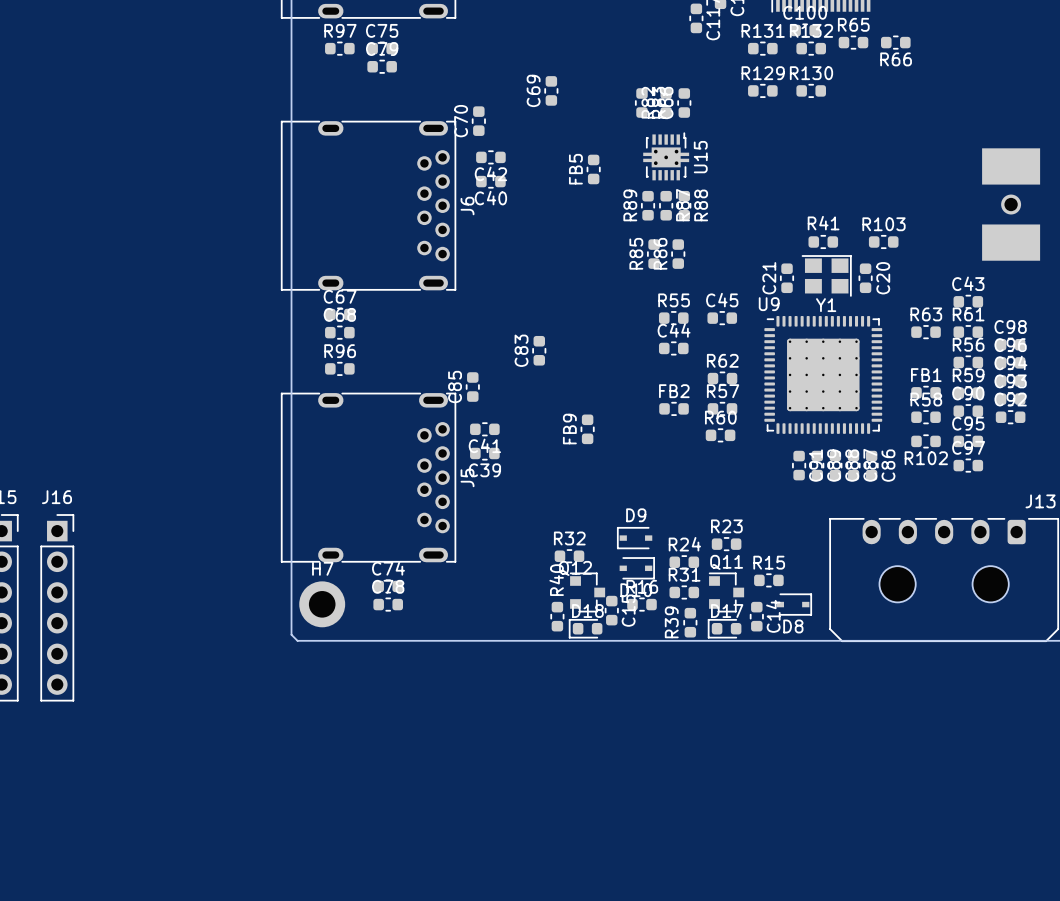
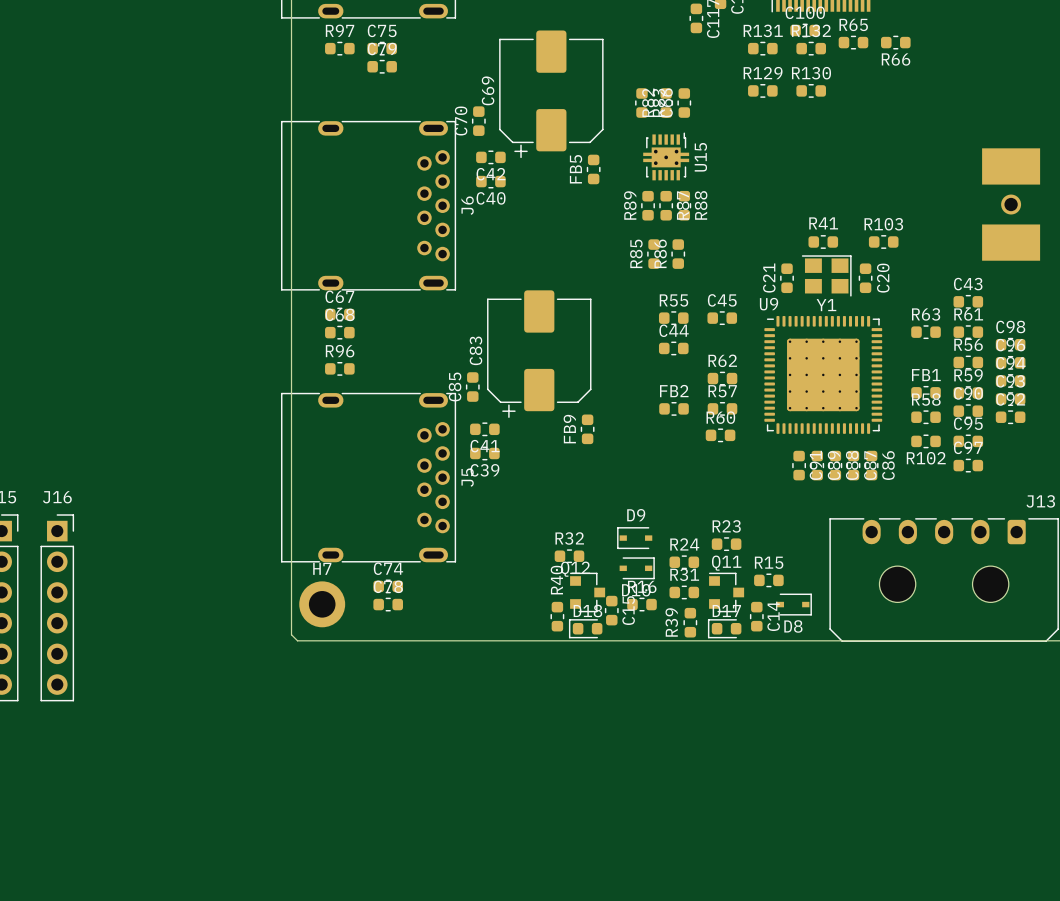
C69 footprint: [544, 76, 559, 106] -> [499, 30, 604, 159]
C69 name position: C69 (533, 90) -> C69 (488, 90)
C83 footprint: [532, 335, 547, 366] -> [487, 290, 592, 418]
C83 name position: C83 (521, 350) -> C83 (475, 350)

